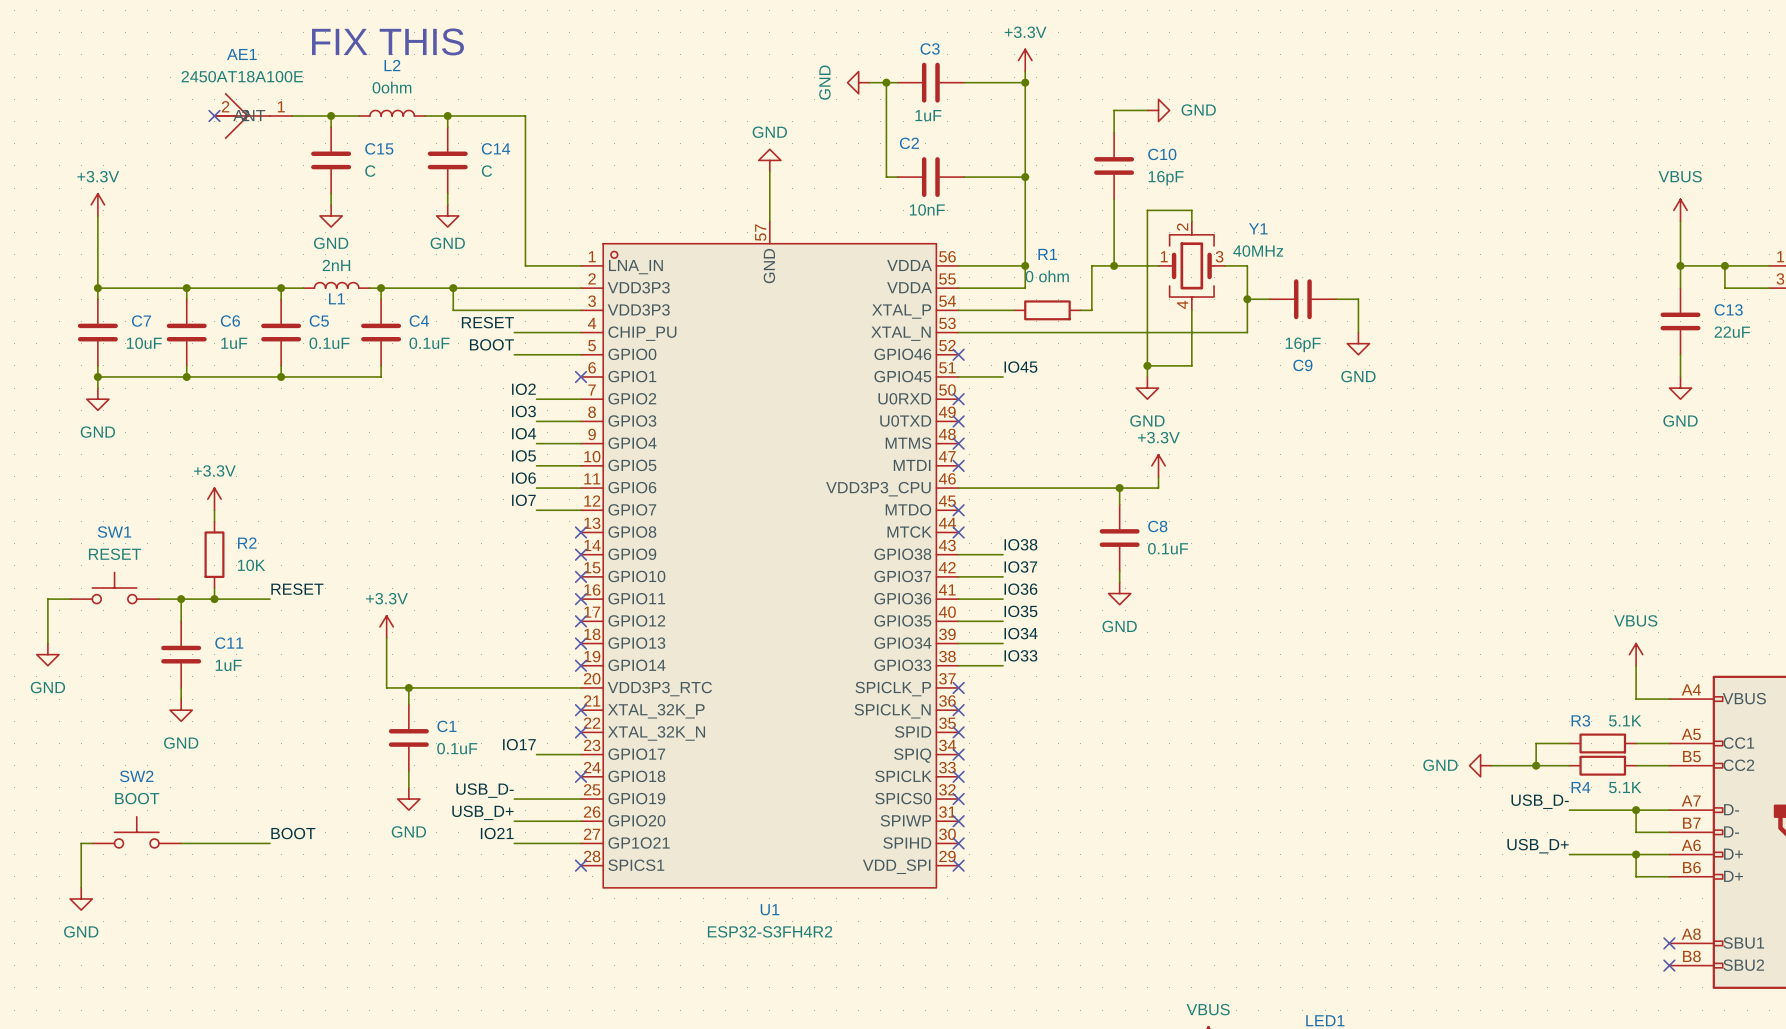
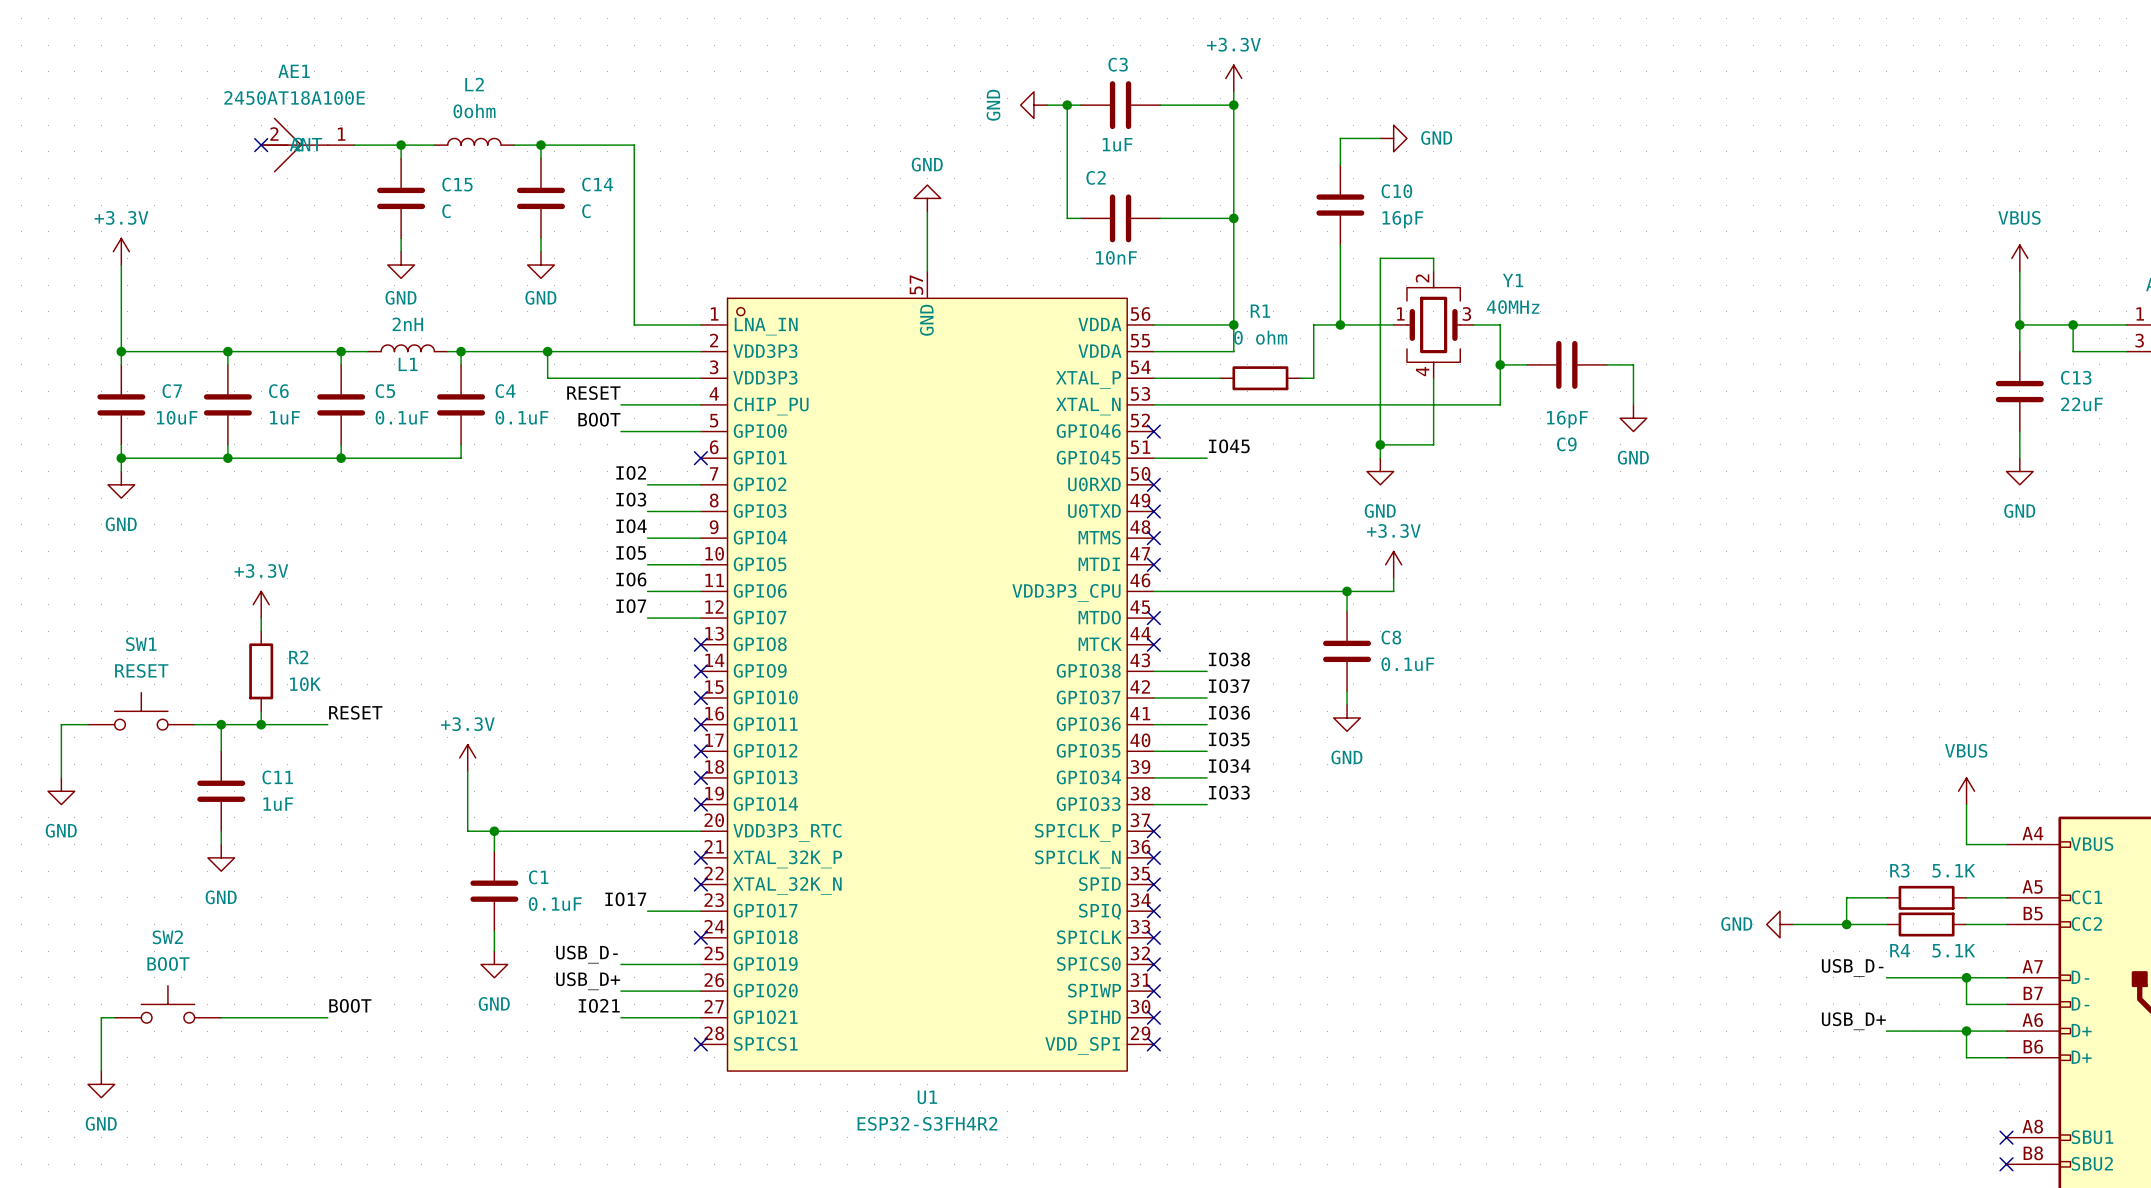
text: FIX THIS (387, 41) -> none

